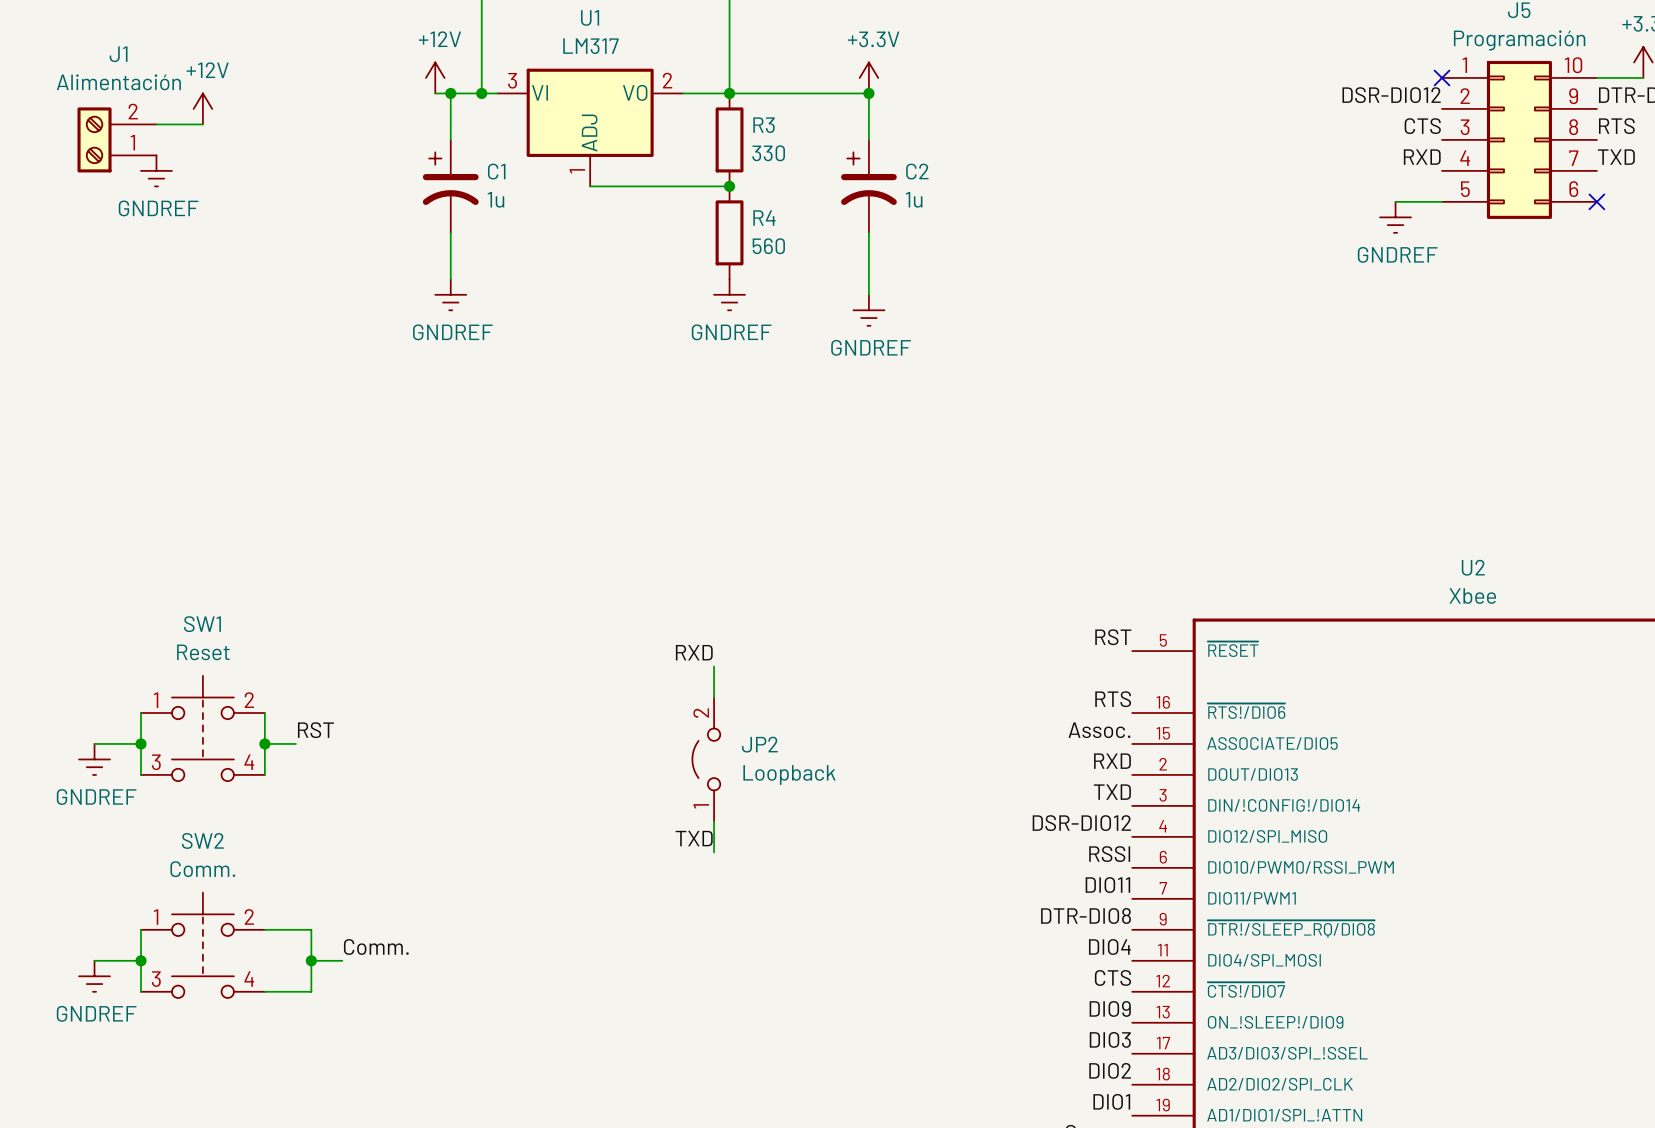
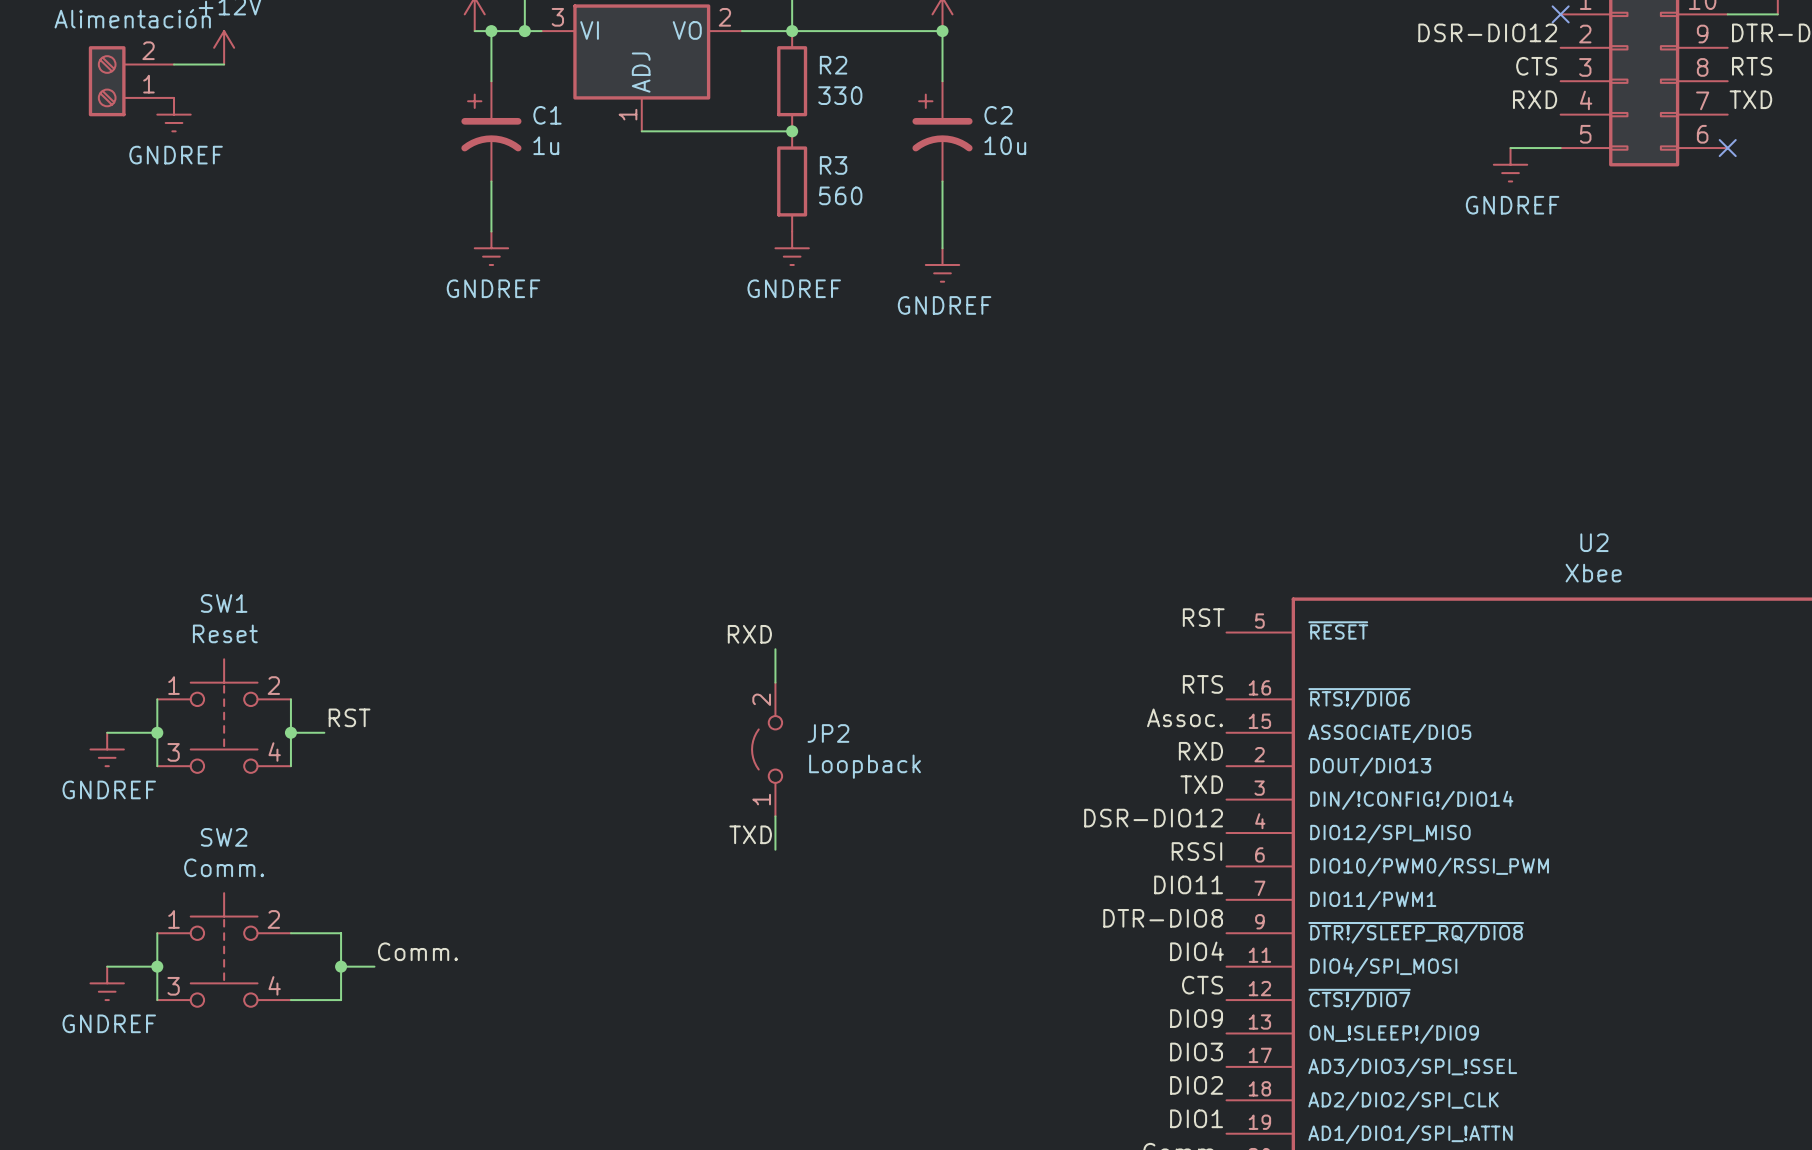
R3 name: R3 (764, 125) -> R2 (833, 65)
C2 value: 1u (914, 199) -> 10u (1005, 145)
R4 name: R4 (764, 218) -> R3 (833, 165)

